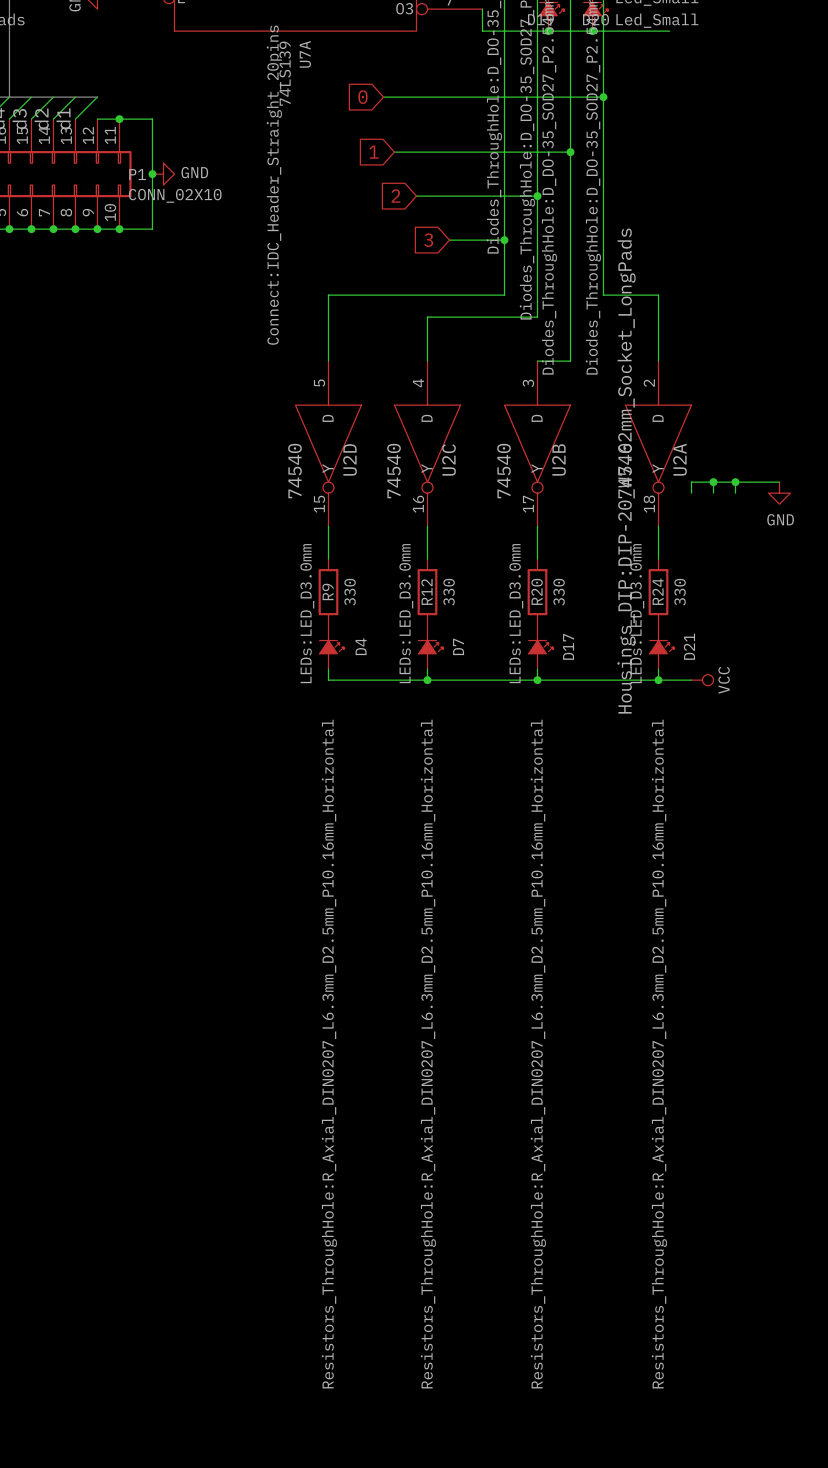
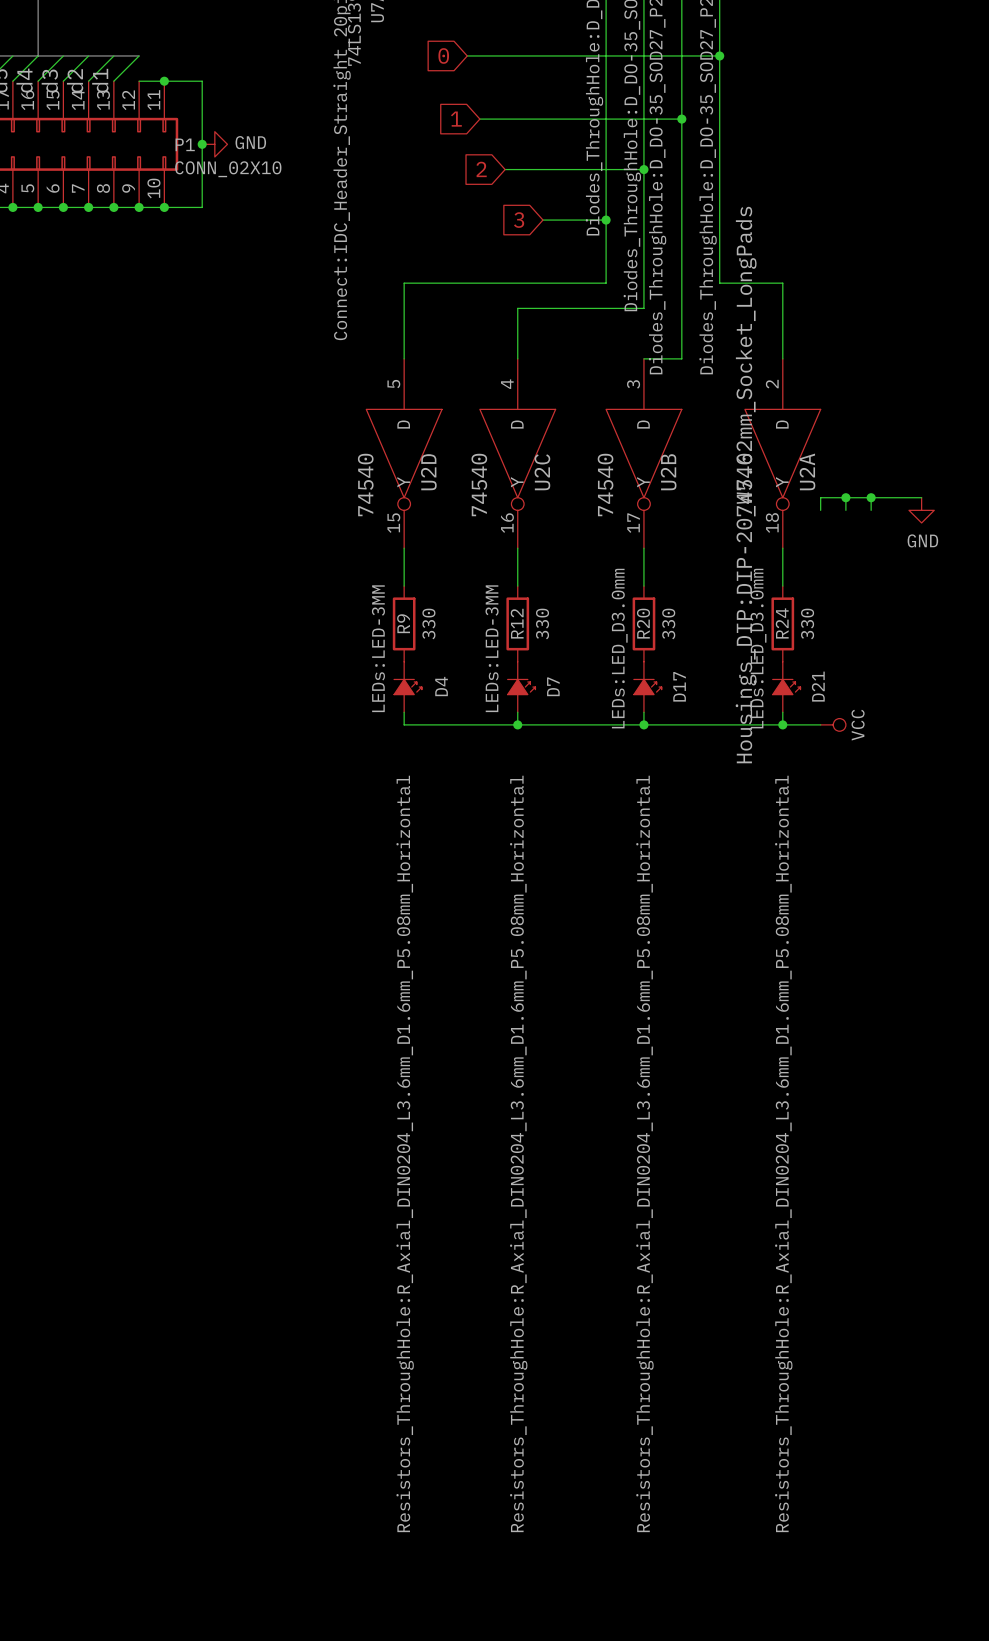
D4 text: LEDs:LED_D3.0mm (307, 613) -> LEDs:LED-3MM (378, 648)
D7 text: LEDs:LED_D3.0mm (406, 613) -> LEDs:LED-3MM (492, 648)
R9 text: Resistors_ThroughHole:R_Axial_DIN0207_L6.3mm_D2.5mm_P10.16mm_Horizontal (329, 1054) -> Resistors_ThroughHole:R_Axial_DIN0204_L3.6mm_D1.6mm_P5.08mm_Horizontal (405, 1153)
R12 text: Resistors_ThroughHole:R_Axial_DIN0207_L6.3mm_D2.5mm_P10.16mm_Horizontal (428, 1054) -> Resistors_ThroughHole:R_Axial_DIN0204_L3.6mm_D1.6mm_P5.08mm_Horizontal (518, 1153)
R20 text: Resistors_ThroughHole:R_Axial_DIN0207_L6.3mm_D2.5mm_P10.16mm_Horizontal (538, 1054) -> Resistors_ThroughHole:R_Axial_DIN0204_L3.6mm_D1.6mm_P5.08mm_Horizontal (644, 1153)
R24 text: Resistors_ThroughHole:R_Axial_DIN0207_L6.3mm_D2.5mm_P10.16mm_Horizontal (659, 1054) -> Resistors_ThroughHole:R_Axial_DIN0204_L3.6mm_D1.6mm_P5.08mm_Horizontal (783, 1153)

